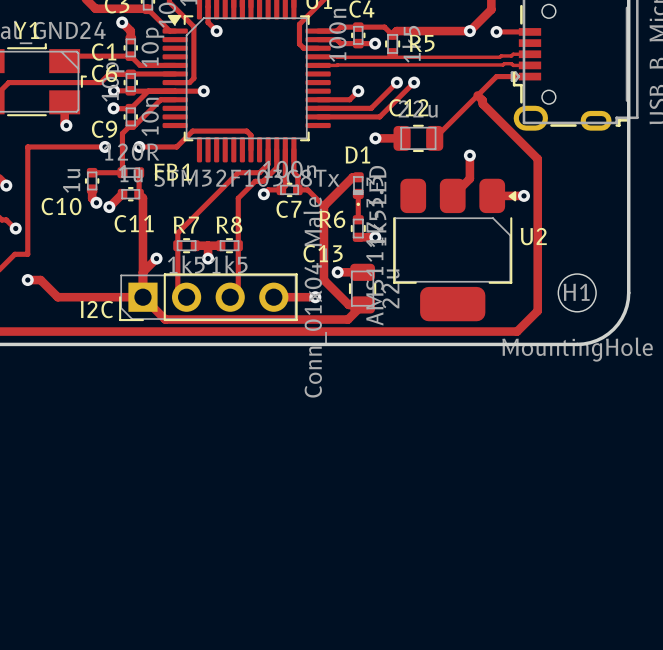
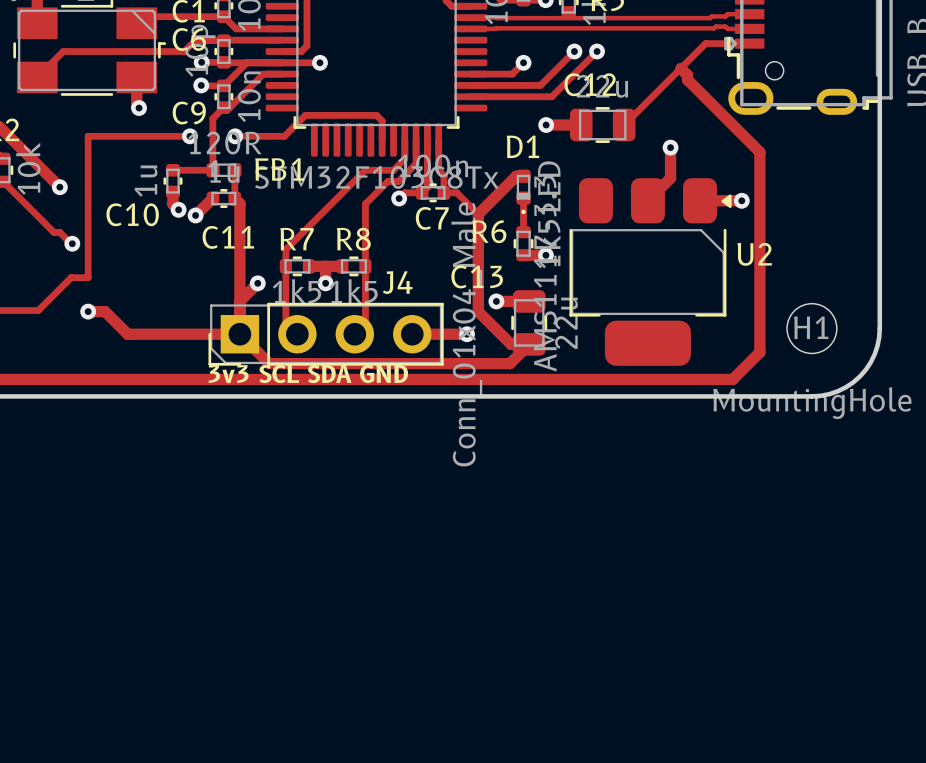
I2C name: I2C (96, 309) -> J4 (397, 282)
text: none -> 3v3 SCL SDA GND (308, 374)

